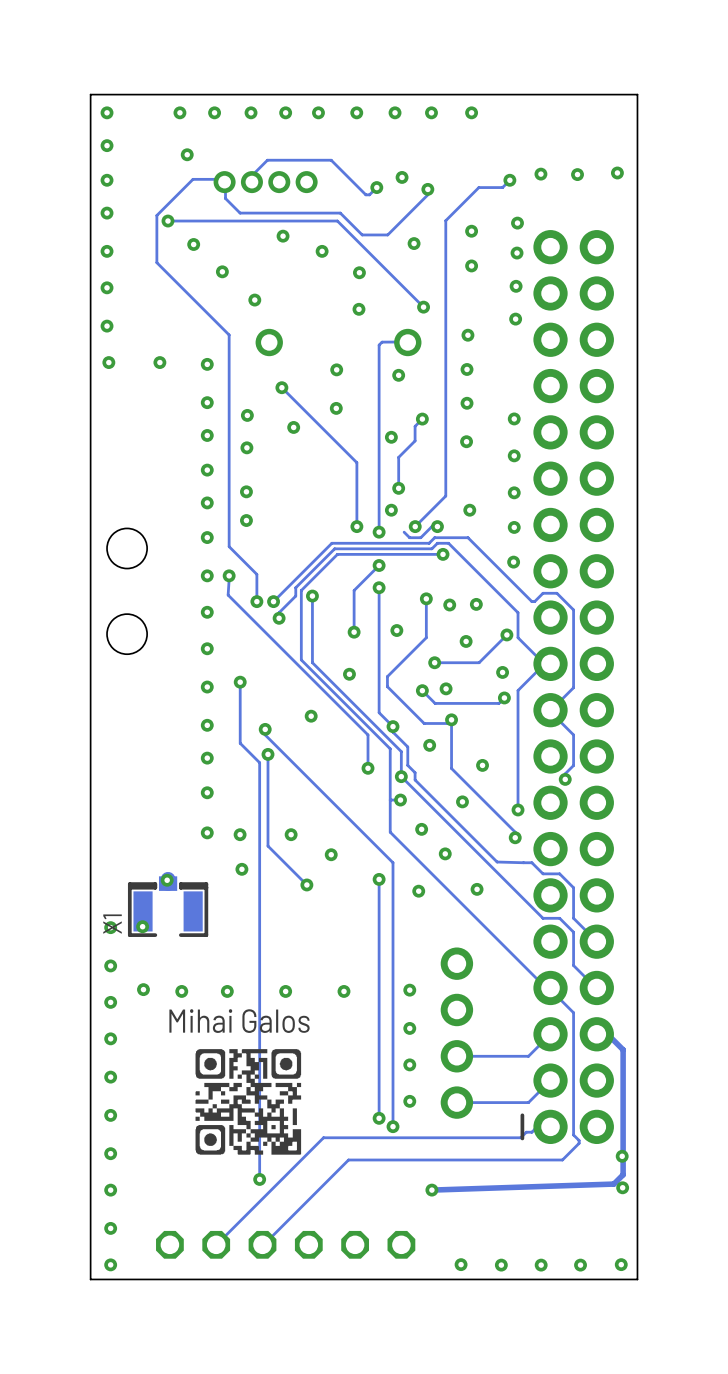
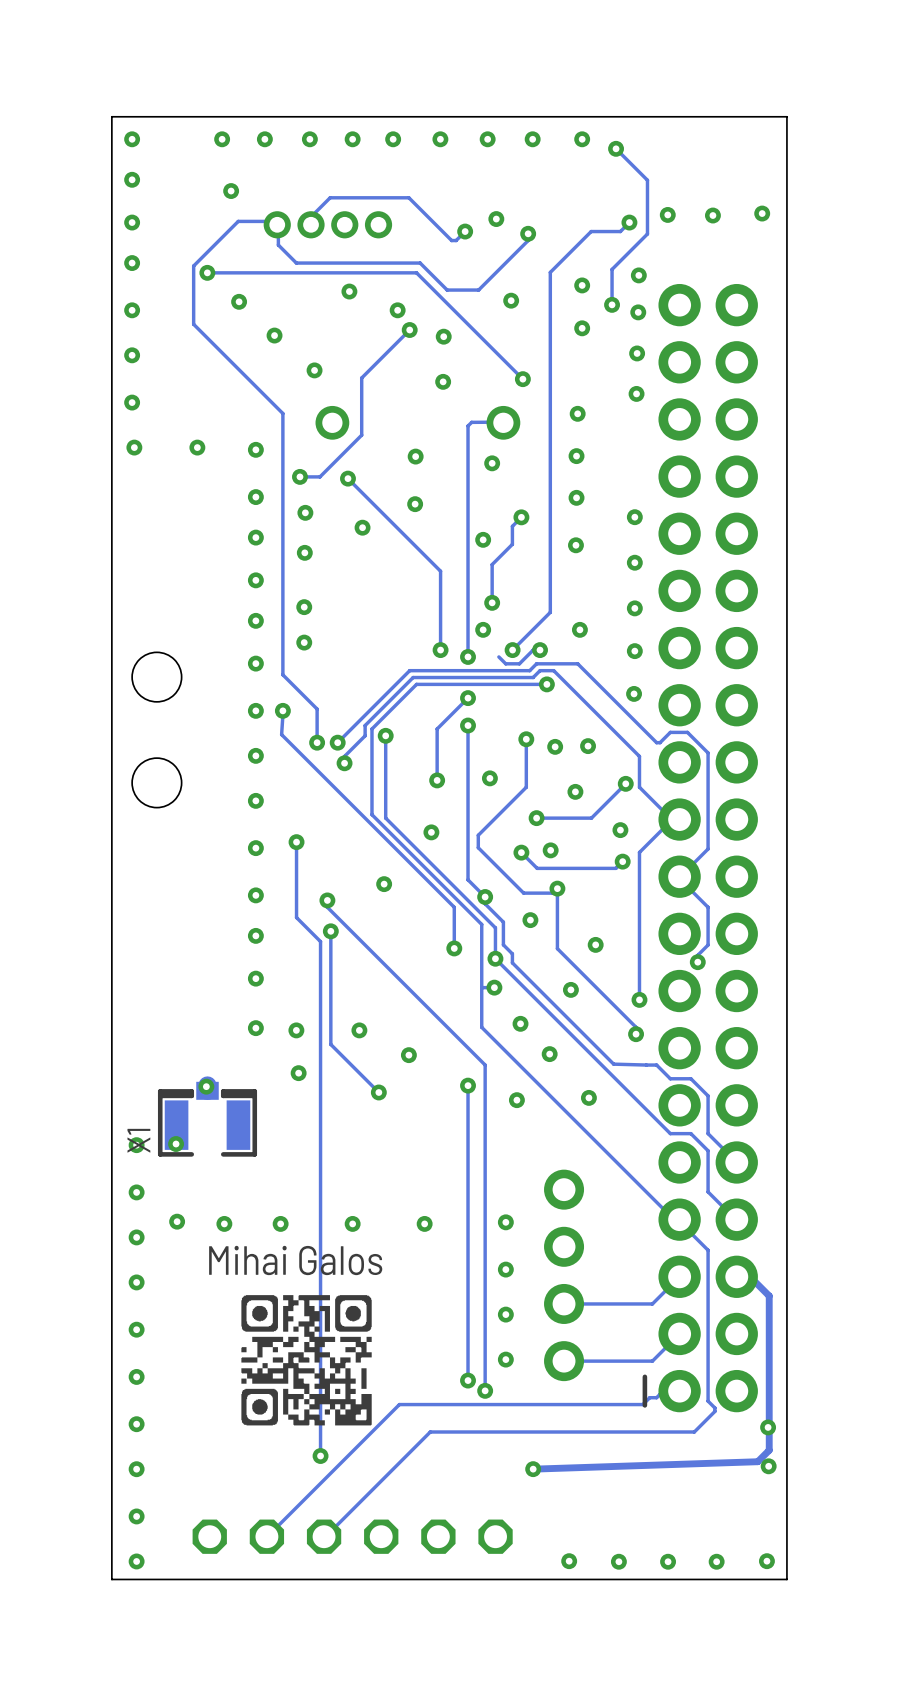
track: none -> (616, 148) (647, 180) (647, 233) (612, 269) (612, 304)
via: none -> (616, 148)
via: none -> (612, 304)
track: none -> (409, 330) (361, 378) (361, 435) (319, 476) (299, 476)
via: none -> (409, 330)
via: none -> (299, 476)

